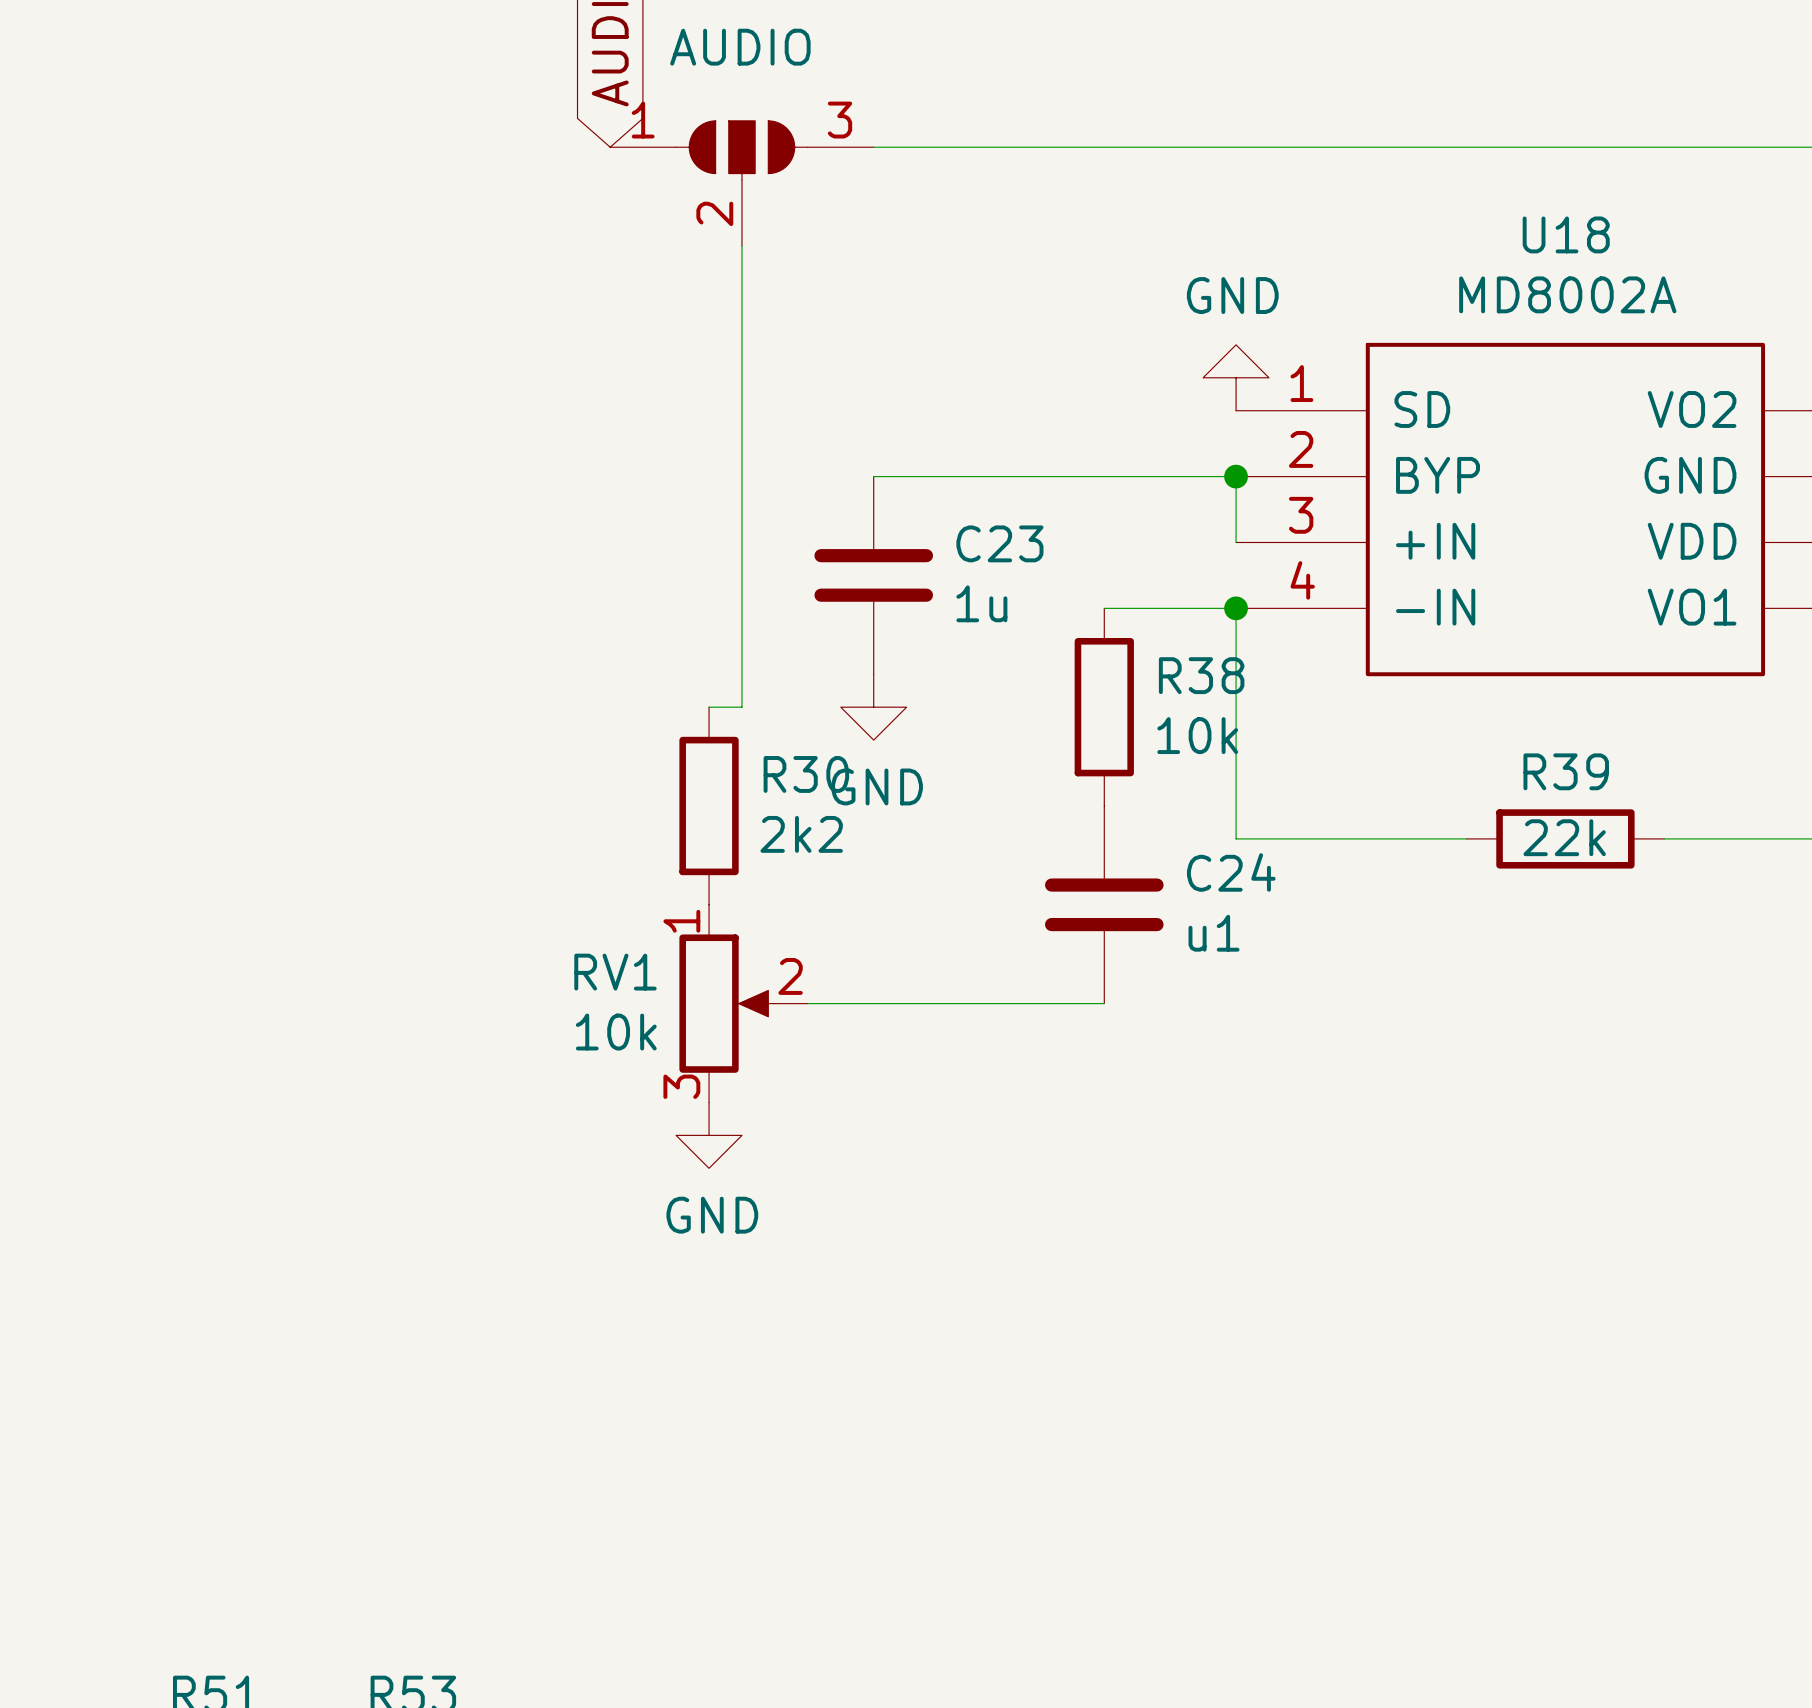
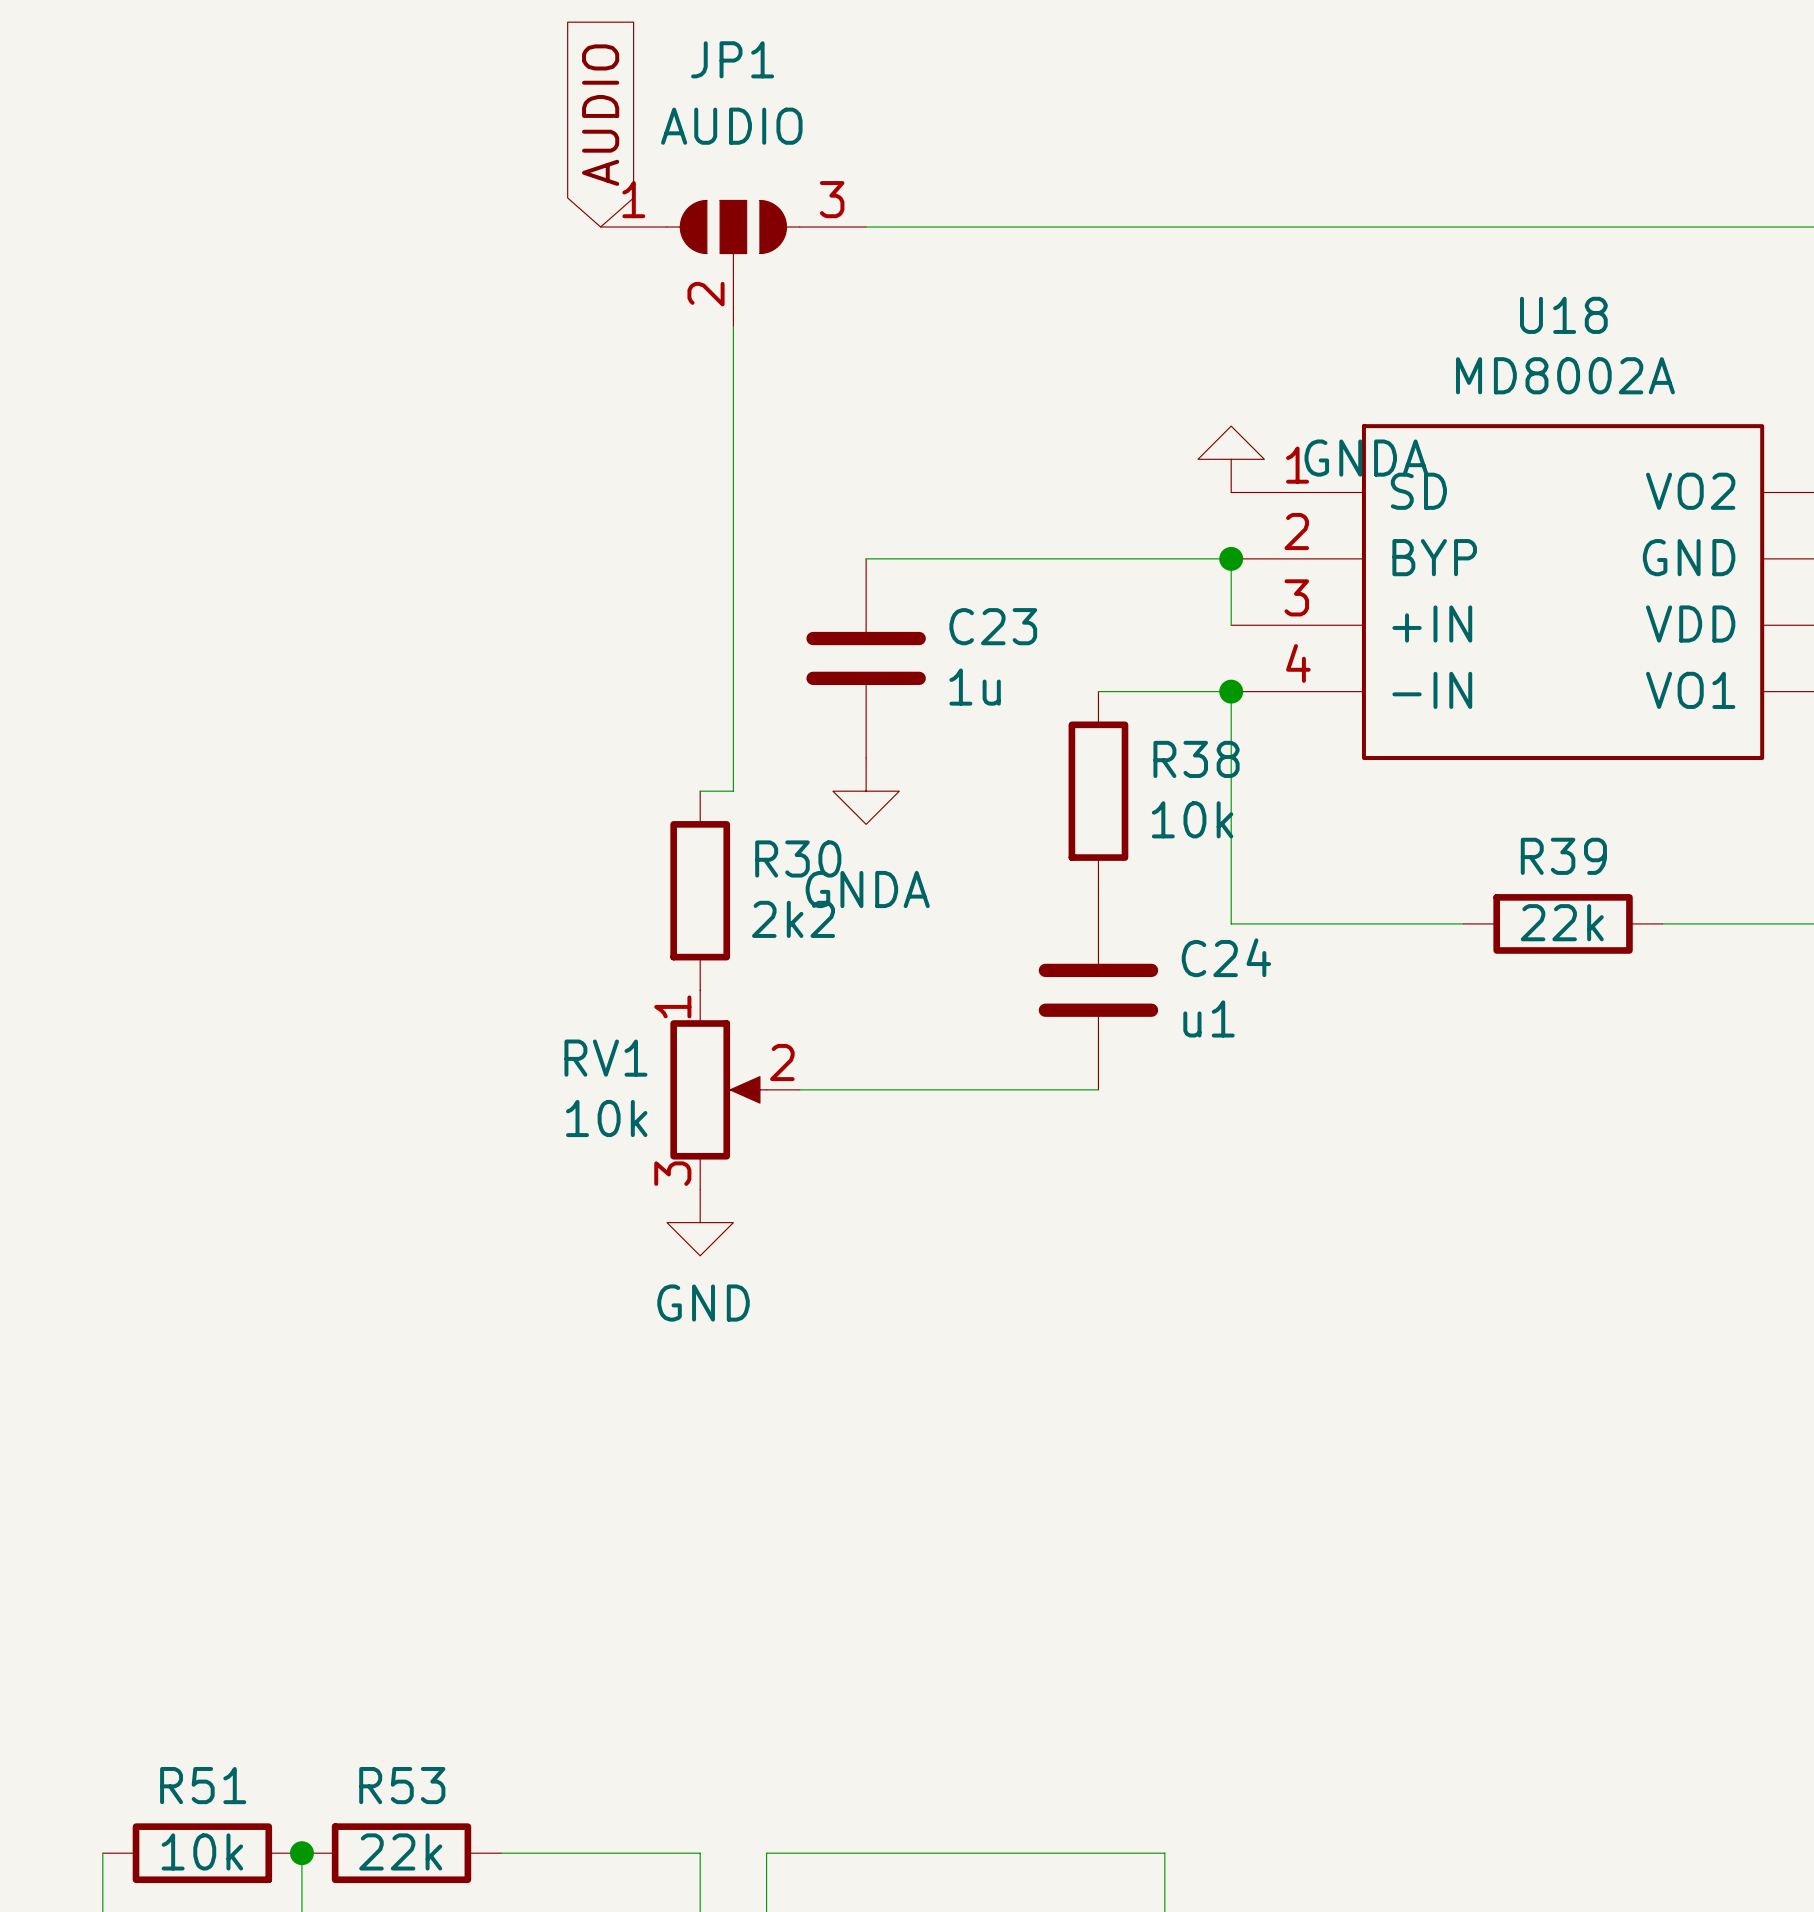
power symbol: GND (1236, 377) -> GNDA (1231, 459)
power symbol: GND (873, 707) -> GNDA (866, 791)

